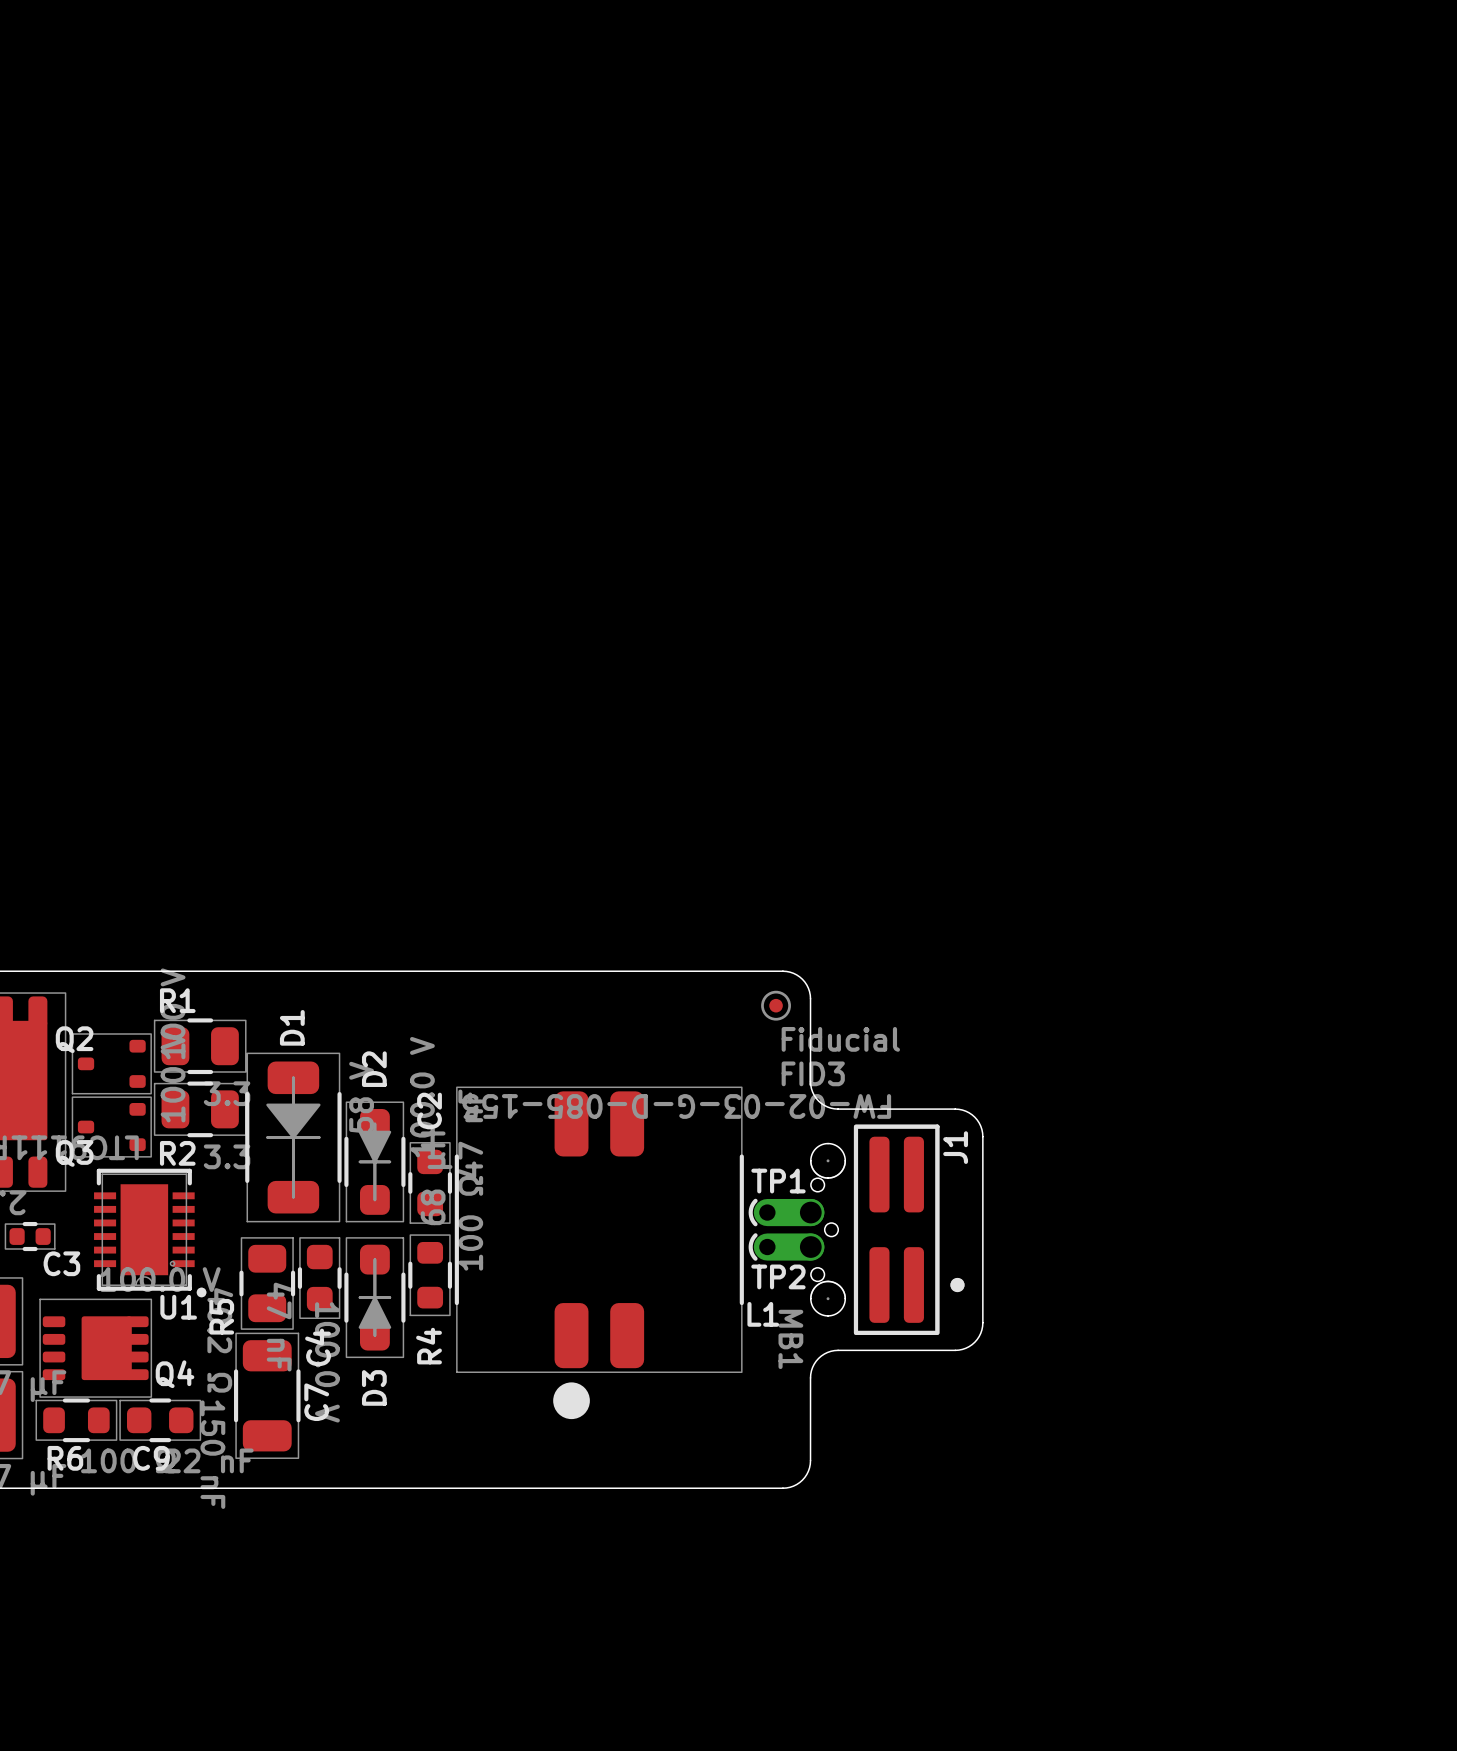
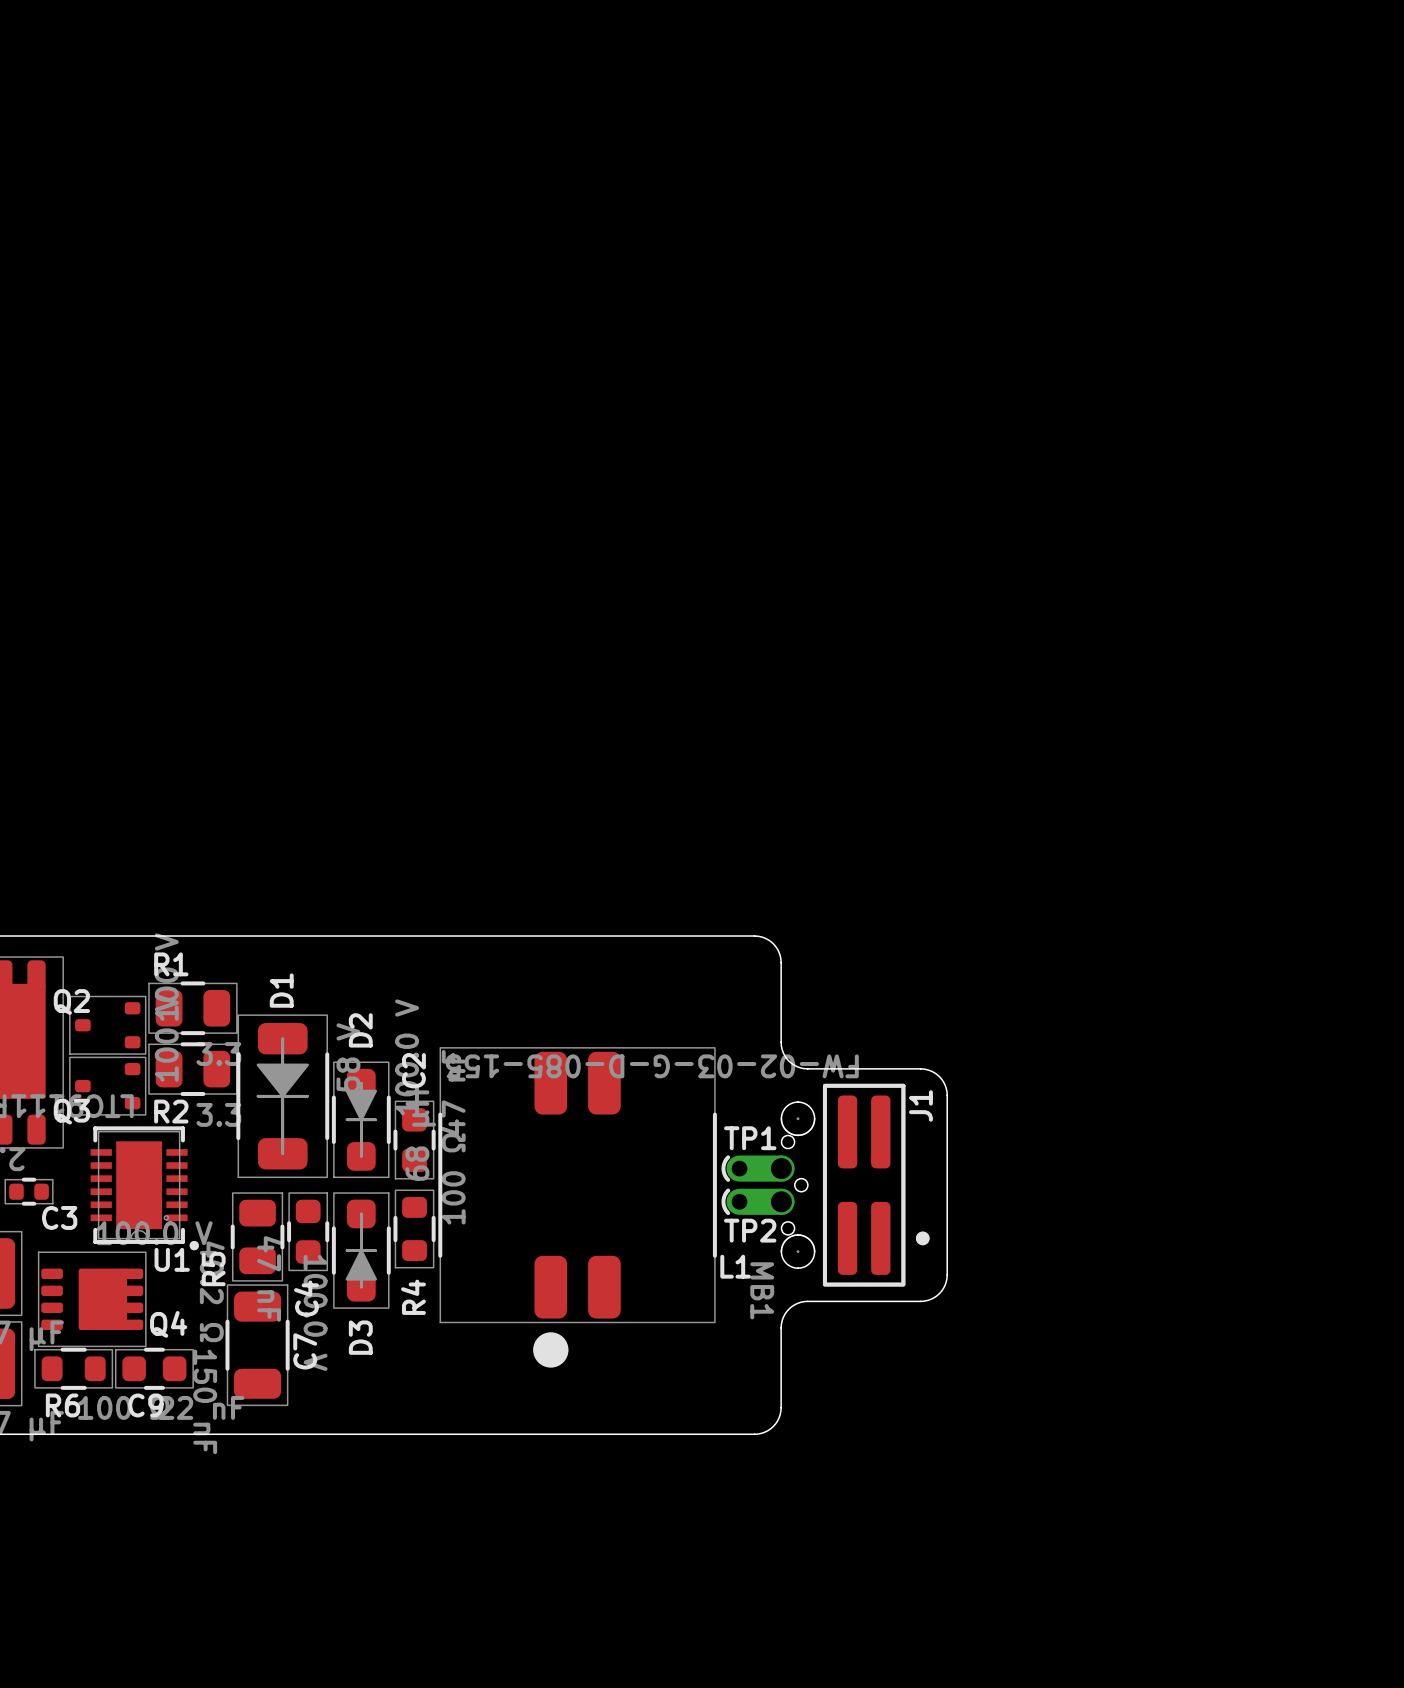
FID3: Fiducial (776, 1005) -> none

